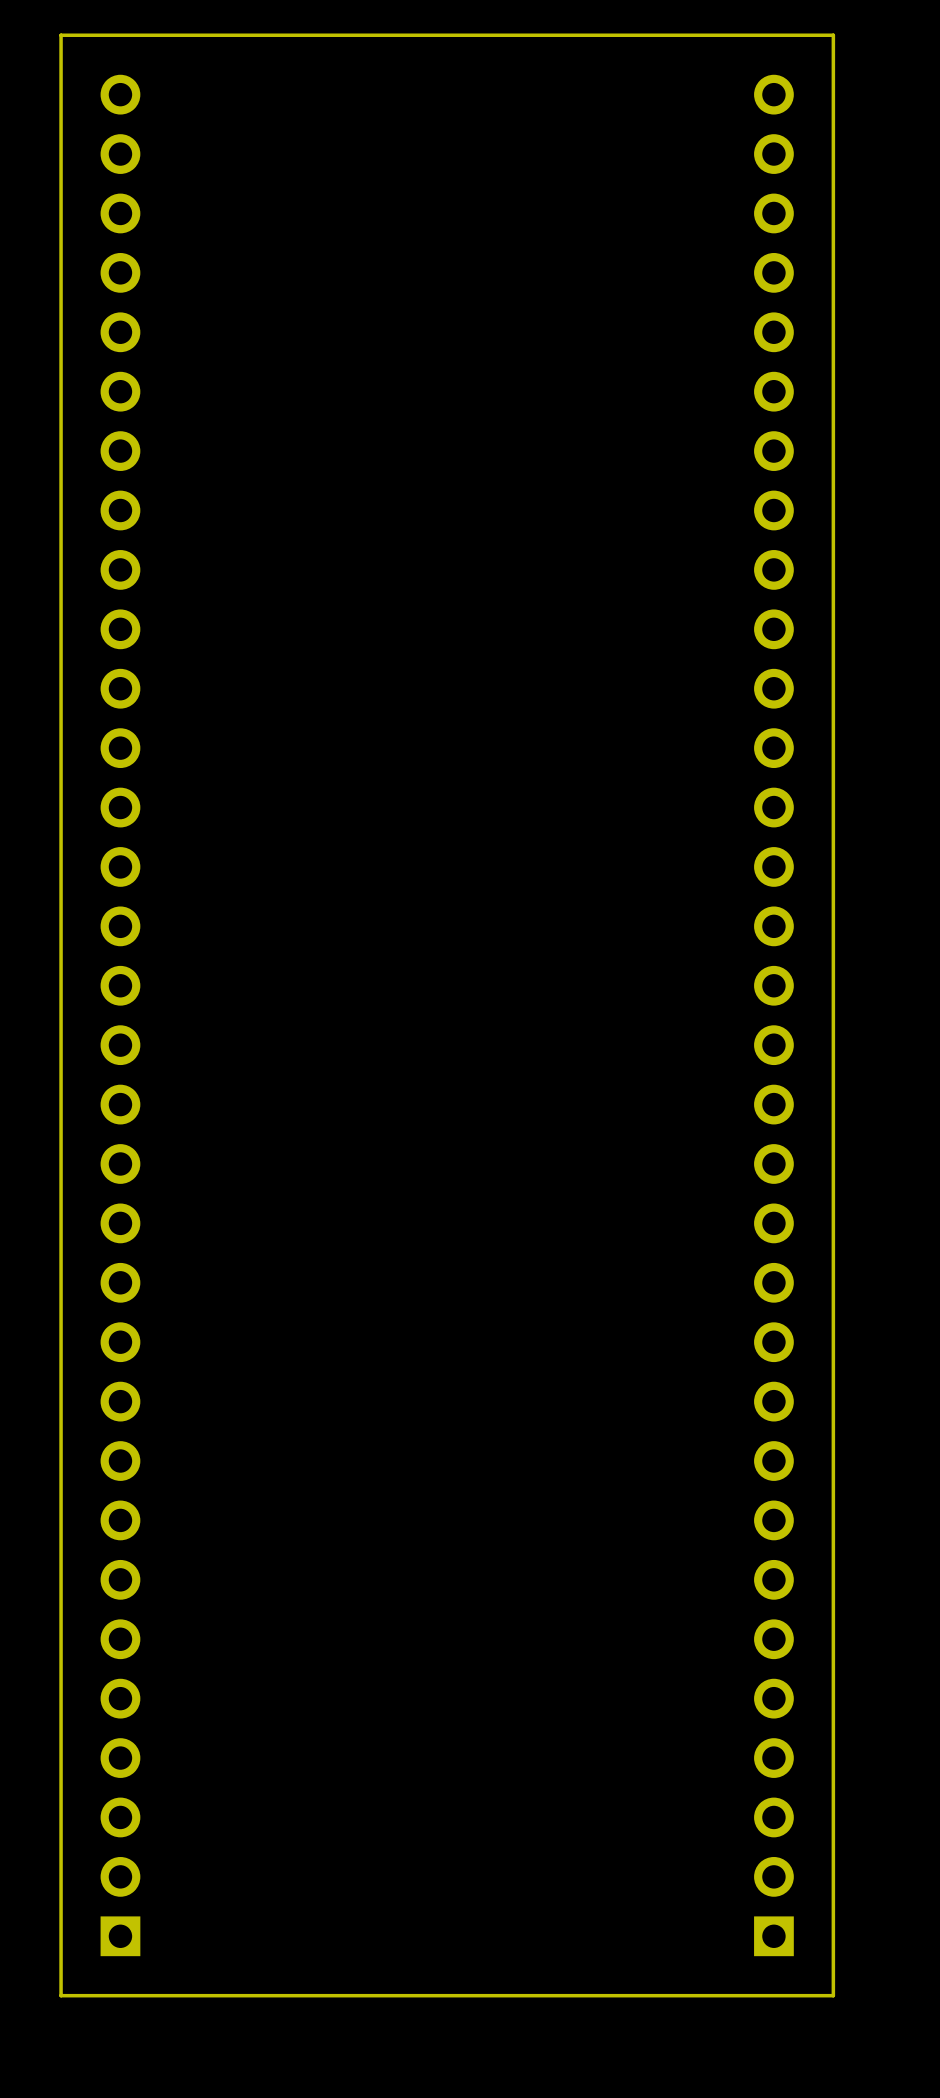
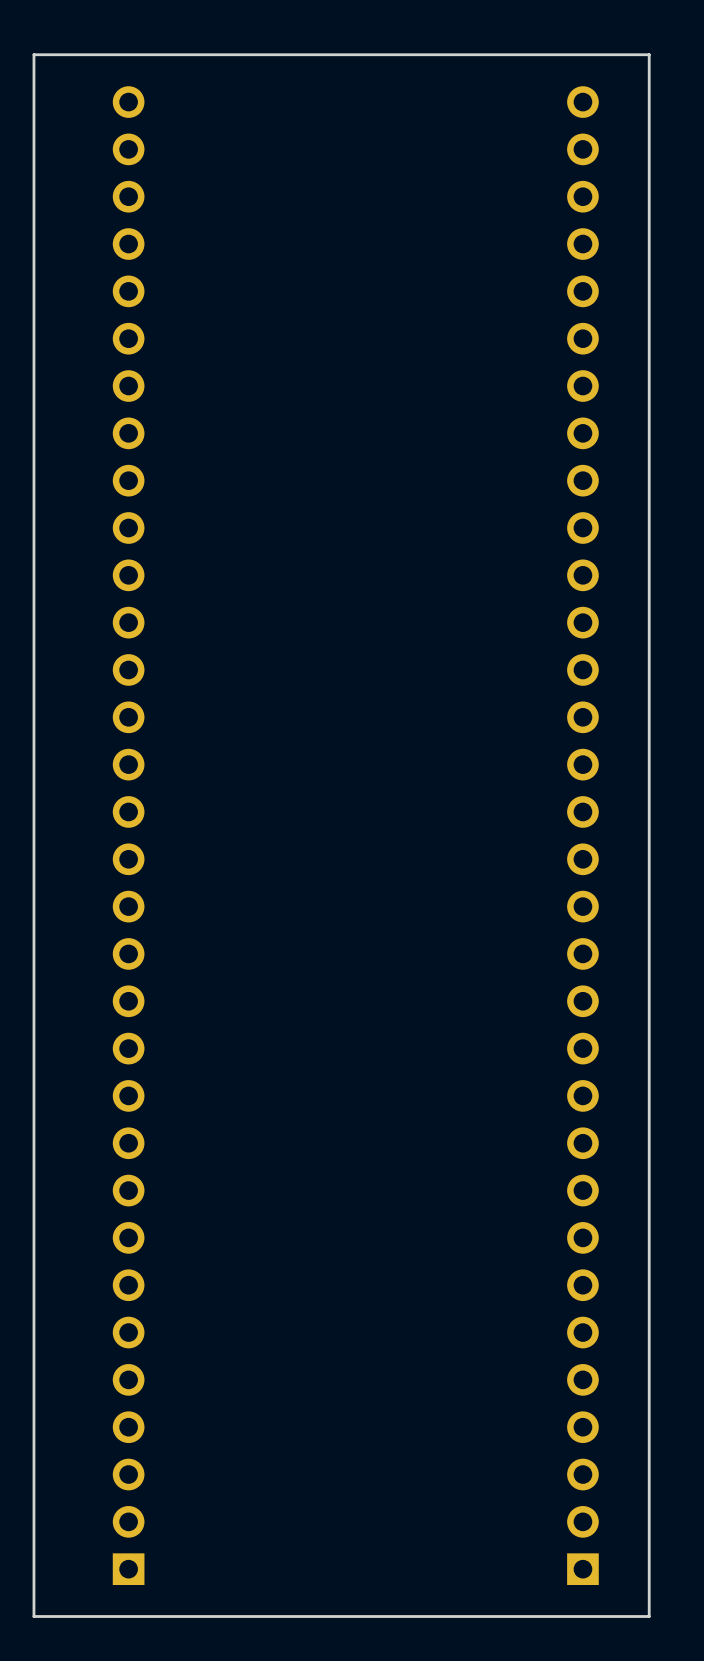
part position: (120, 1015) -> (128, 835)
part position: (773, 1015) -> (582, 835)

